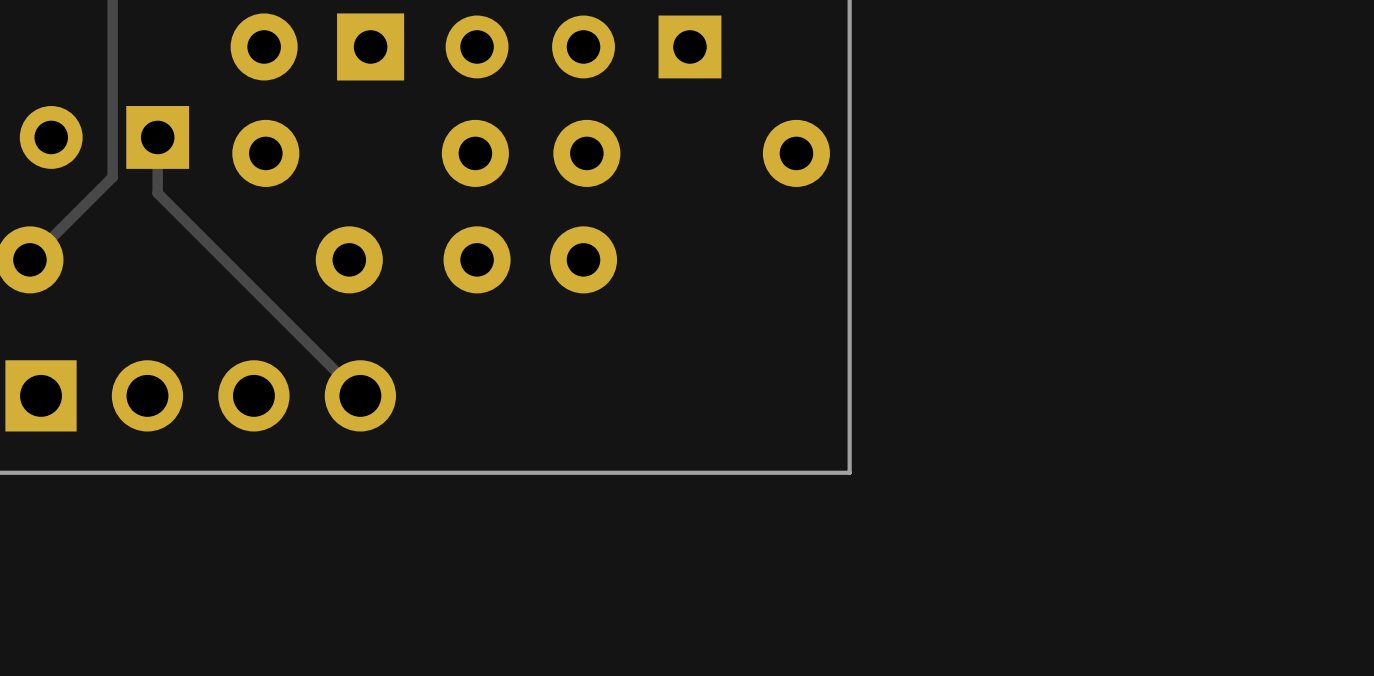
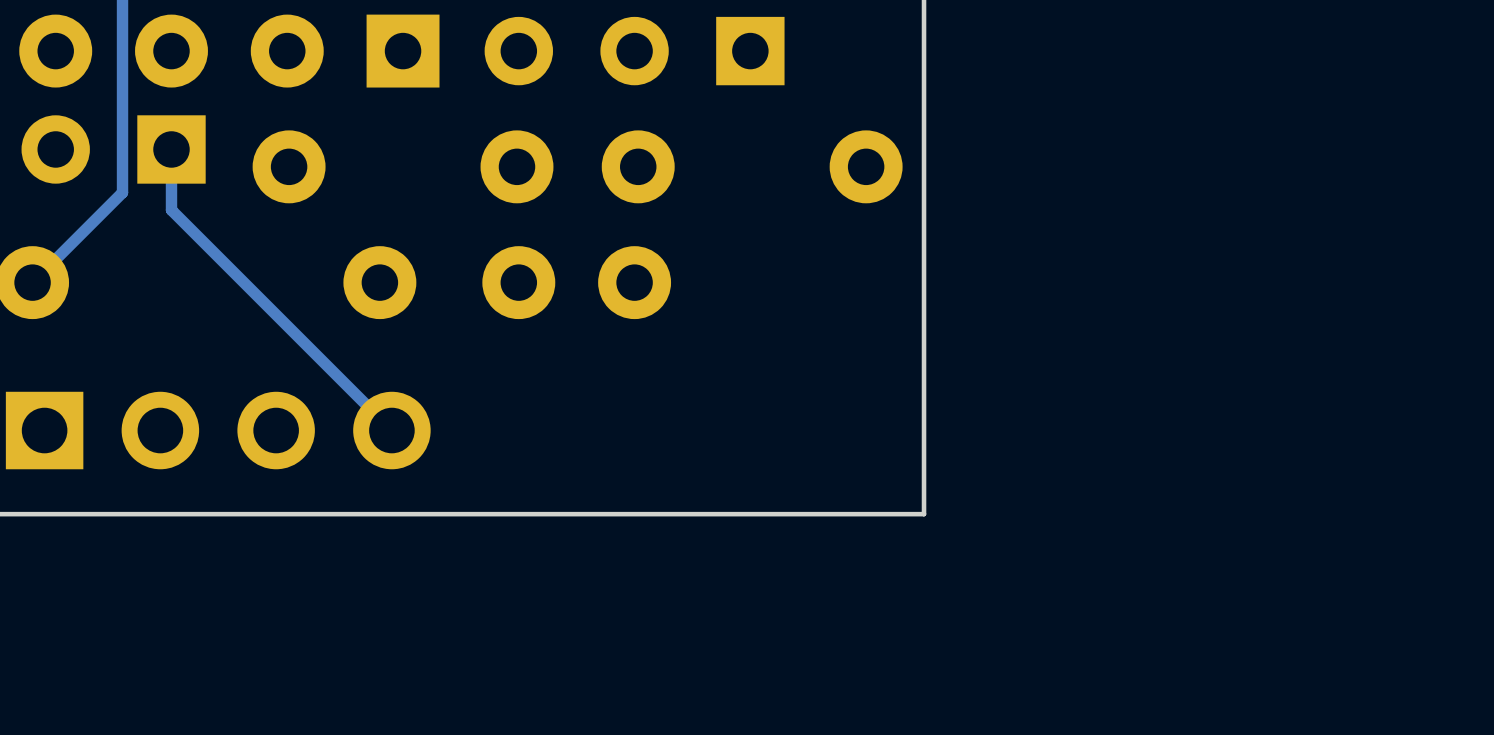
part: none -> (113, 51)

